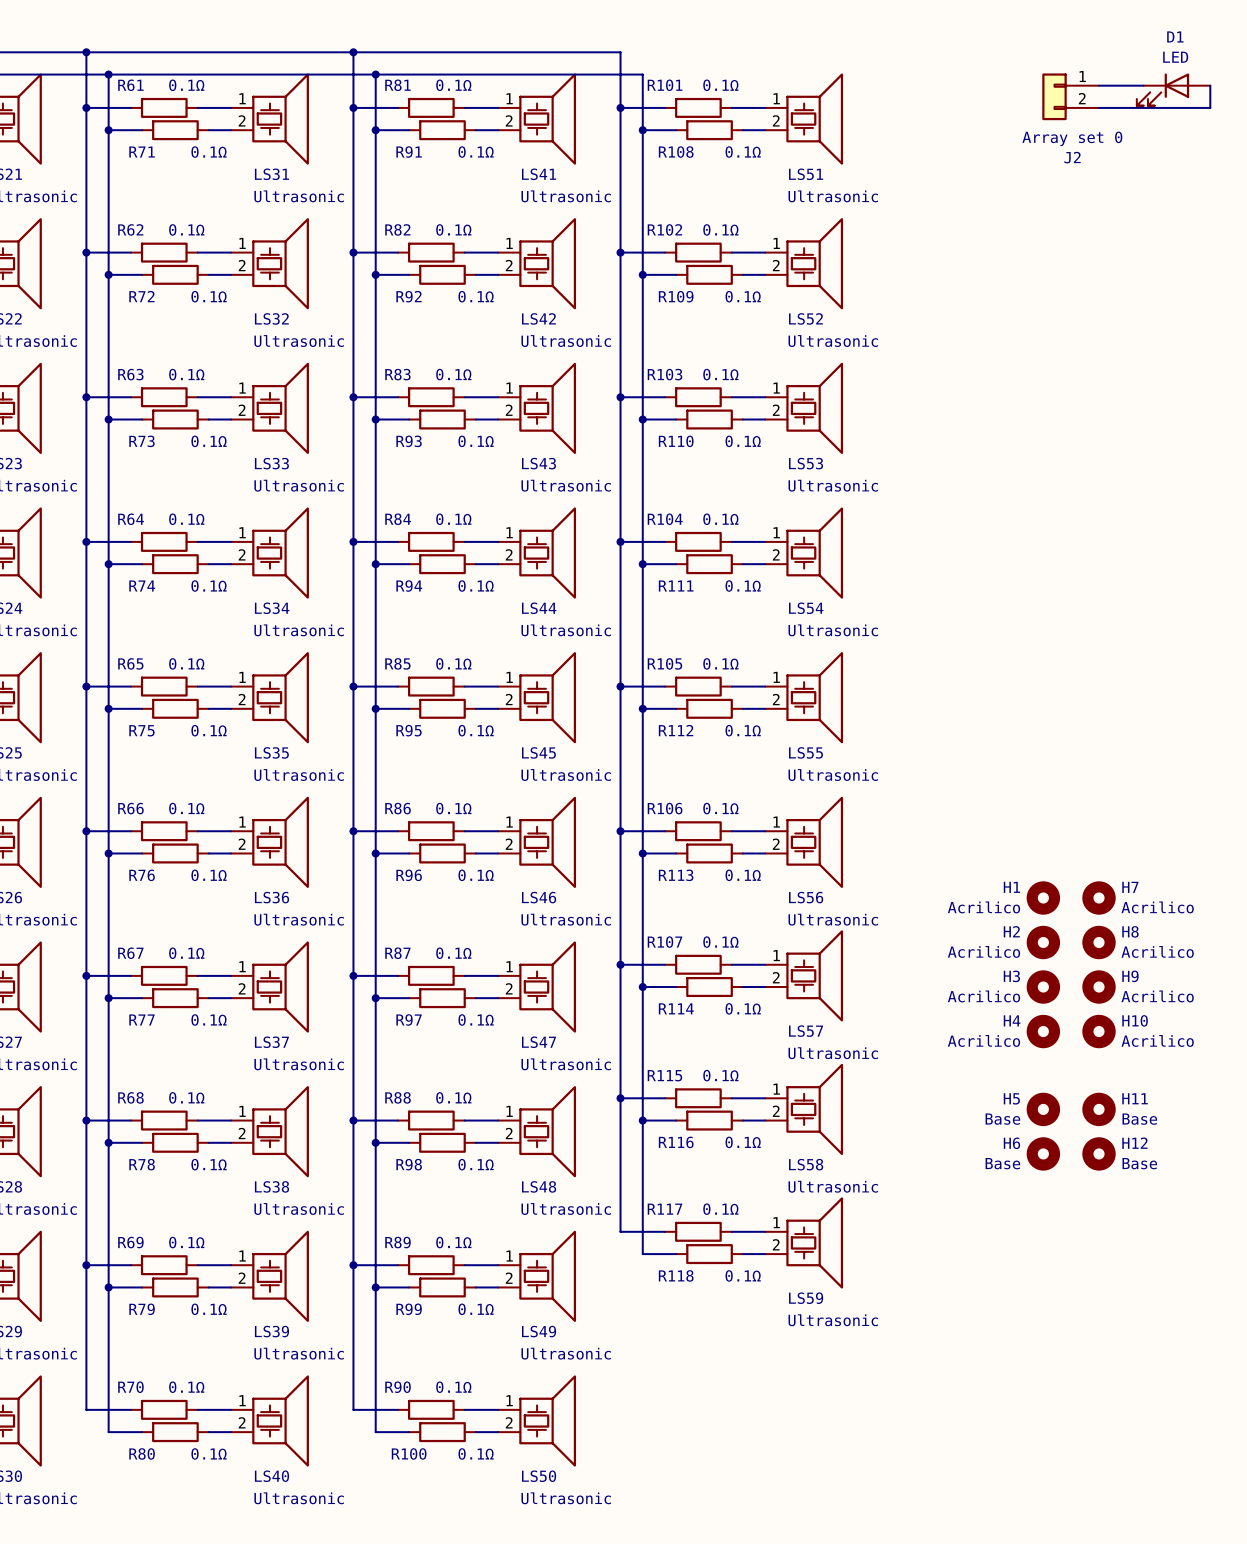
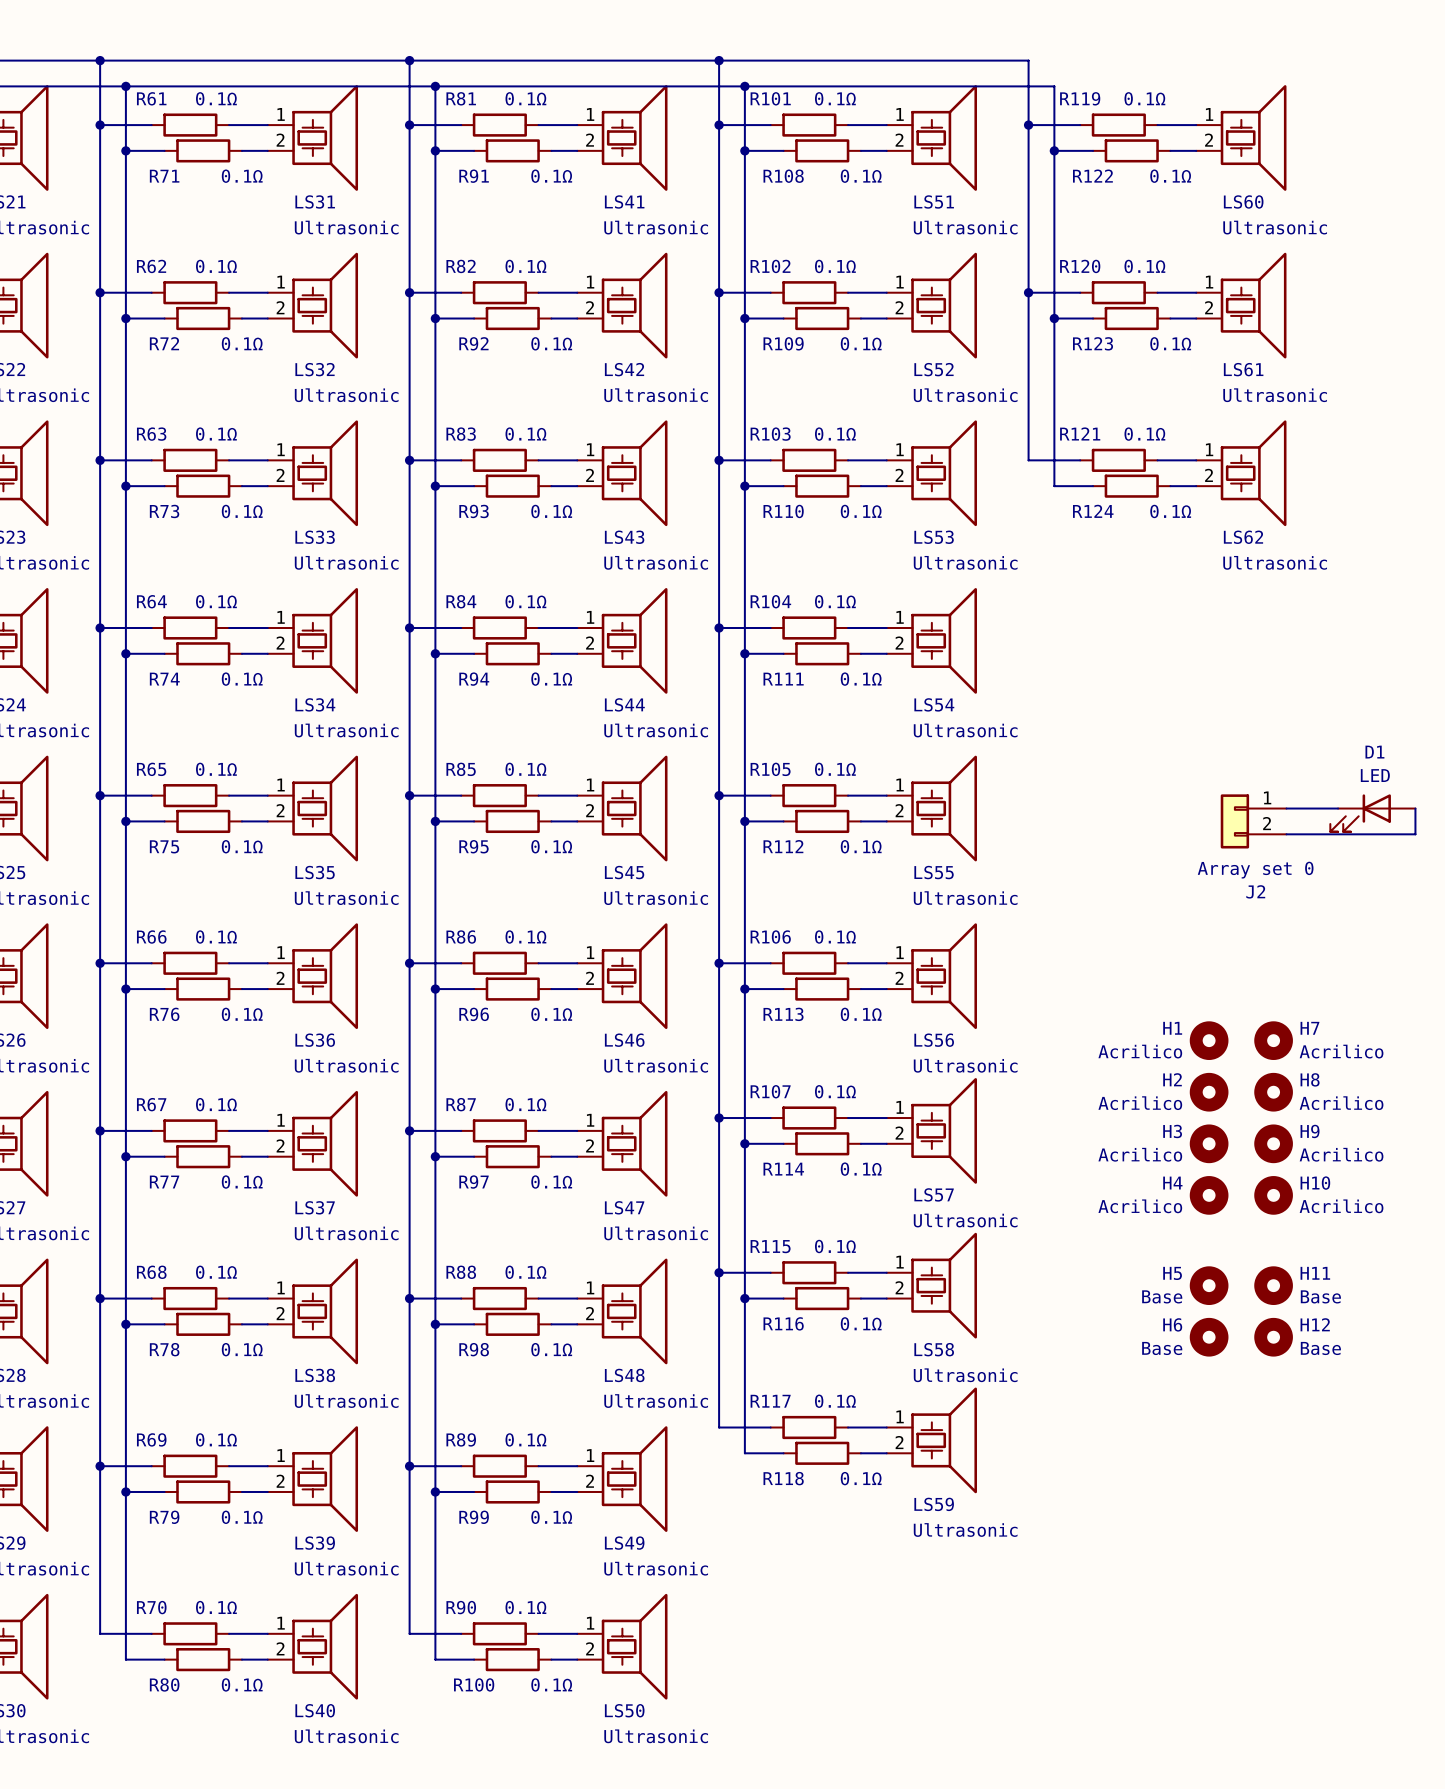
wire: none -> (719, 60) (1028, 60) (1028, 460) (1080, 460)
junction: none -> (719, 60)
wire: none -> (744, 86) (1054, 86) (1054, 486) (1093, 486)
junction: none -> (744, 86)
wire: (1099, 85) (1143, 85) -> (1028, 125) (1080, 125)
wire: (1210, 85) (1210, 107) (1099, 107) -> none
D1 position: (1173, 89) -> (1372, 813)
J2 position: (1070, 96) -> (1253, 821)
junction: none -> (1028, 125)
R119: none -> 0.1Ω (1118, 125)
wire: none -> (1157, 125) (1196, 125)
LS60: none -> Ultrasonic (1241, 137)
wire: none -> (1054, 150) (1093, 150)
junction: none -> (1054, 150)
R122: none -> 0.1Ω (1131, 150)
wire: none -> (1170, 150) (1196, 150)
wire: none -> (1028, 292) (1080, 292)
junction: none -> (1028, 292)
R120: none -> 0.1Ω (1118, 292)
wire: none -> (1157, 292) (1196, 292)
LS61: none -> Ultrasonic (1241, 305)
wire: none -> (1054, 318) (1093, 318)
junction: none -> (1054, 318)
R123: none -> 0.1Ω (1131, 318)
wire: none -> (1170, 318) (1196, 318)
R121: none -> 0.1Ω (1118, 460)
wire: none -> (1157, 460) (1196, 460)
LS62: none -> Ultrasonic (1241, 473)
R124: none -> 0.1Ω (1131, 486)
wire: none -> (1170, 486) (1196, 486)
wire: none -> (1286, 808) (1338, 808)
wire: none -> (1415, 808) (1415, 834) (1286, 834)

